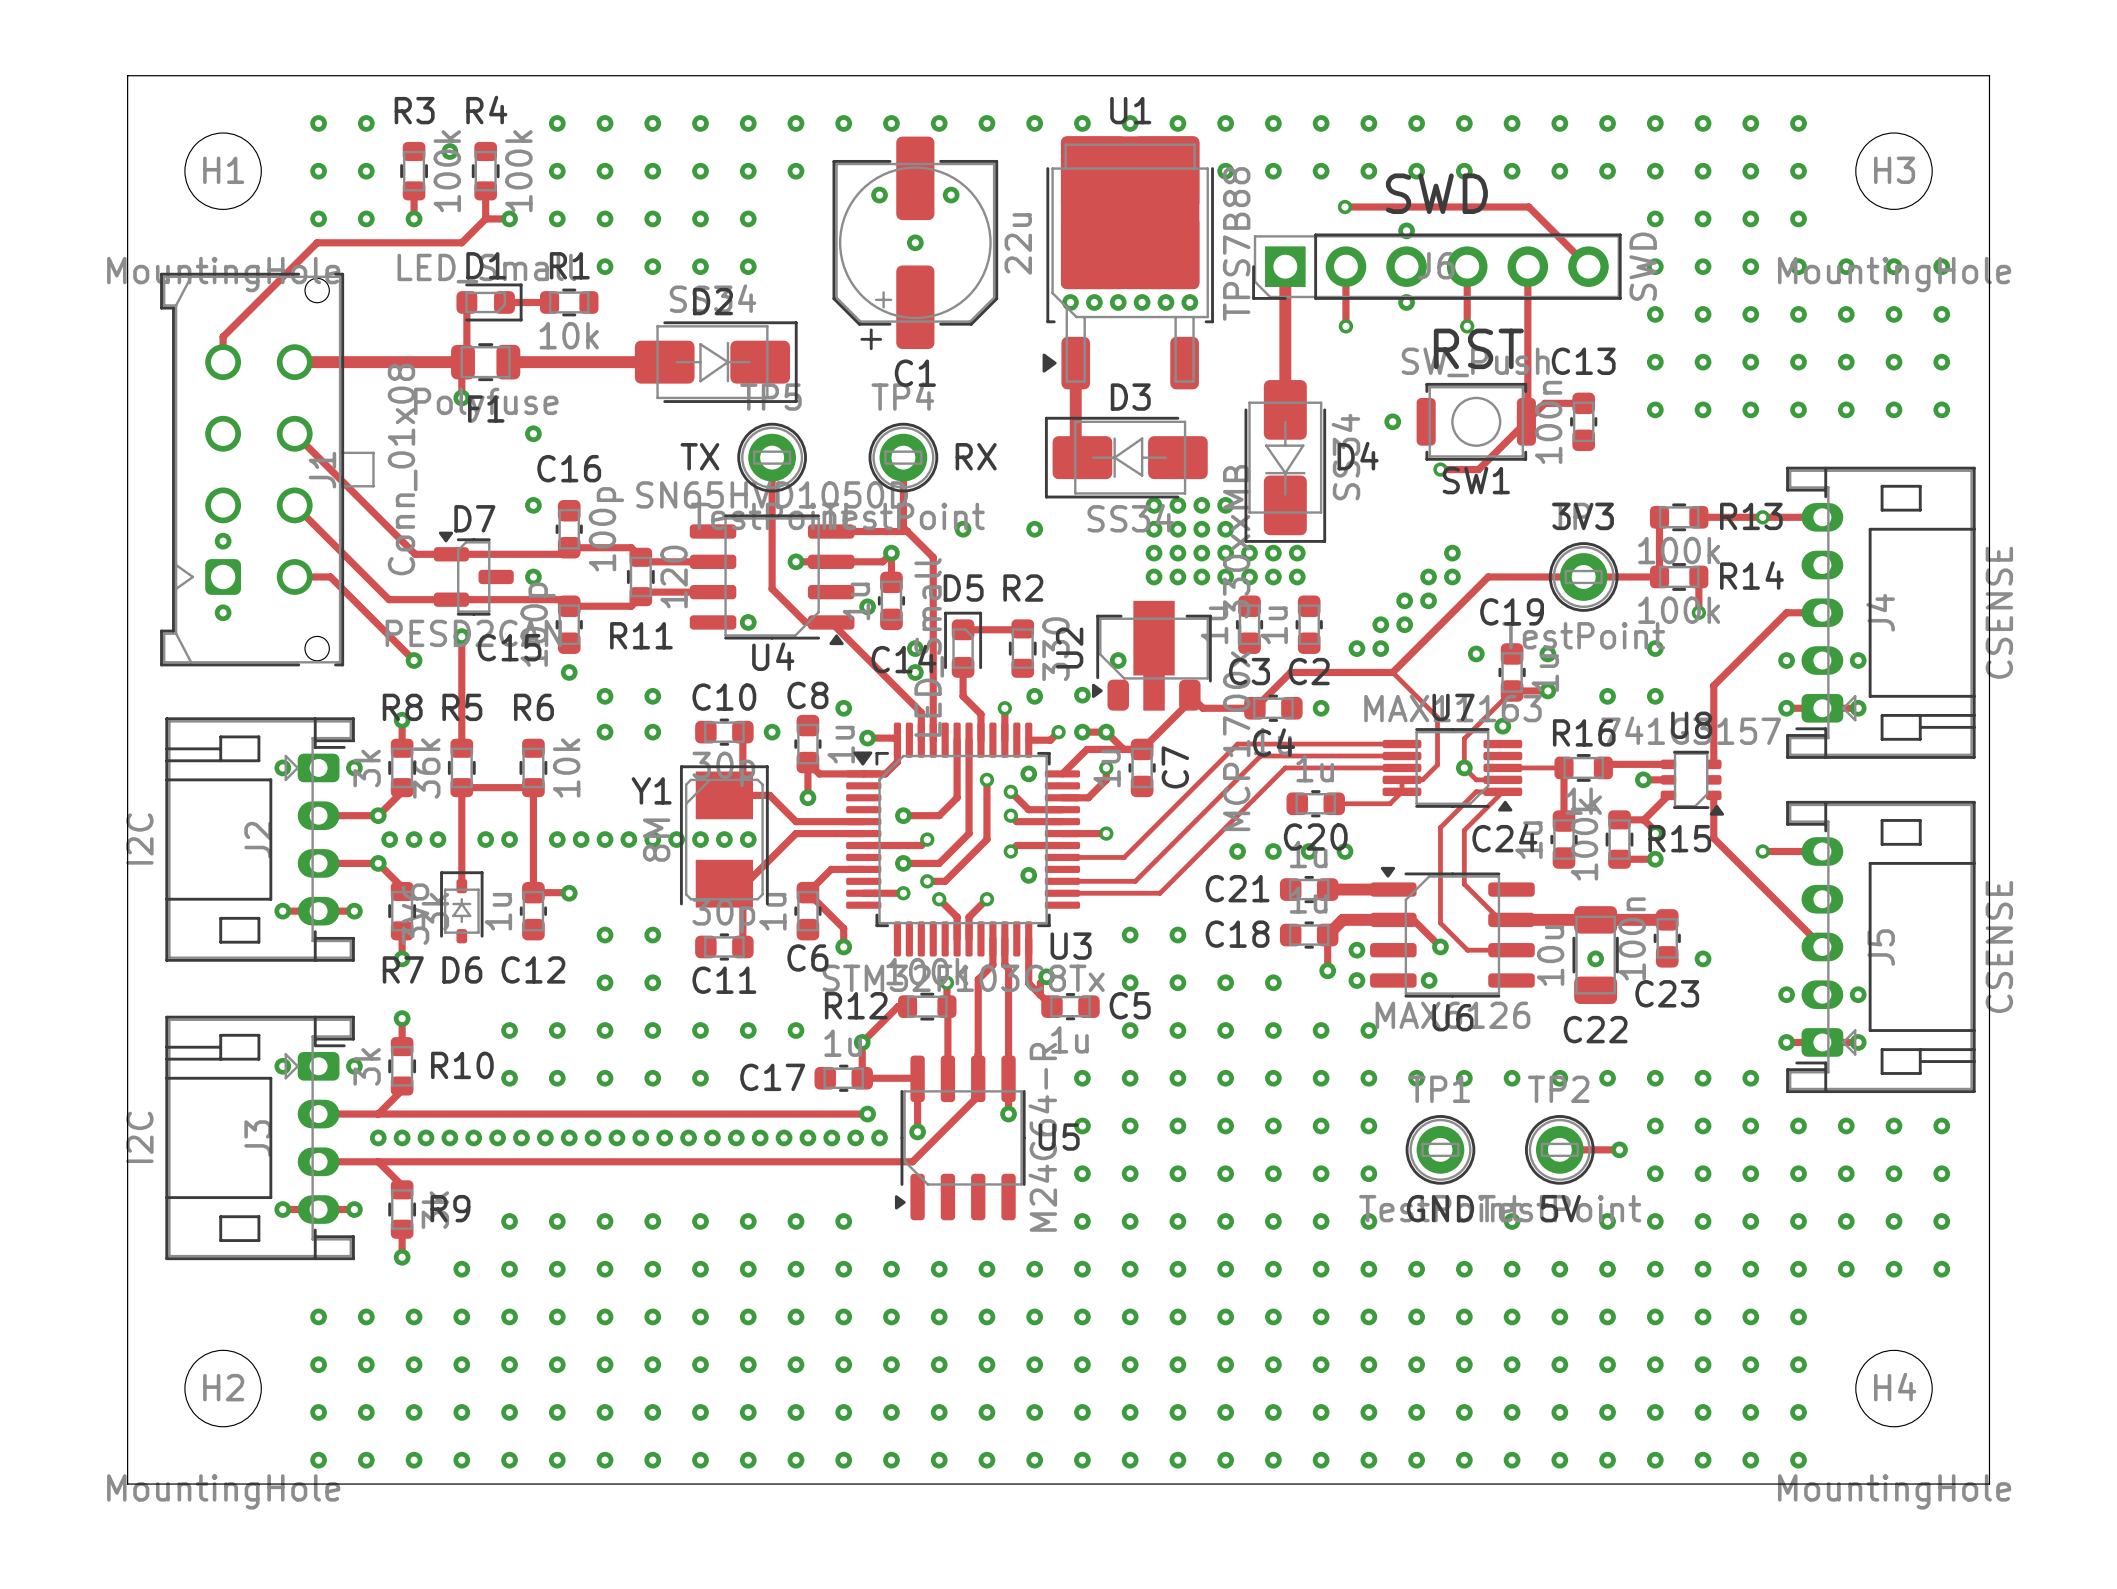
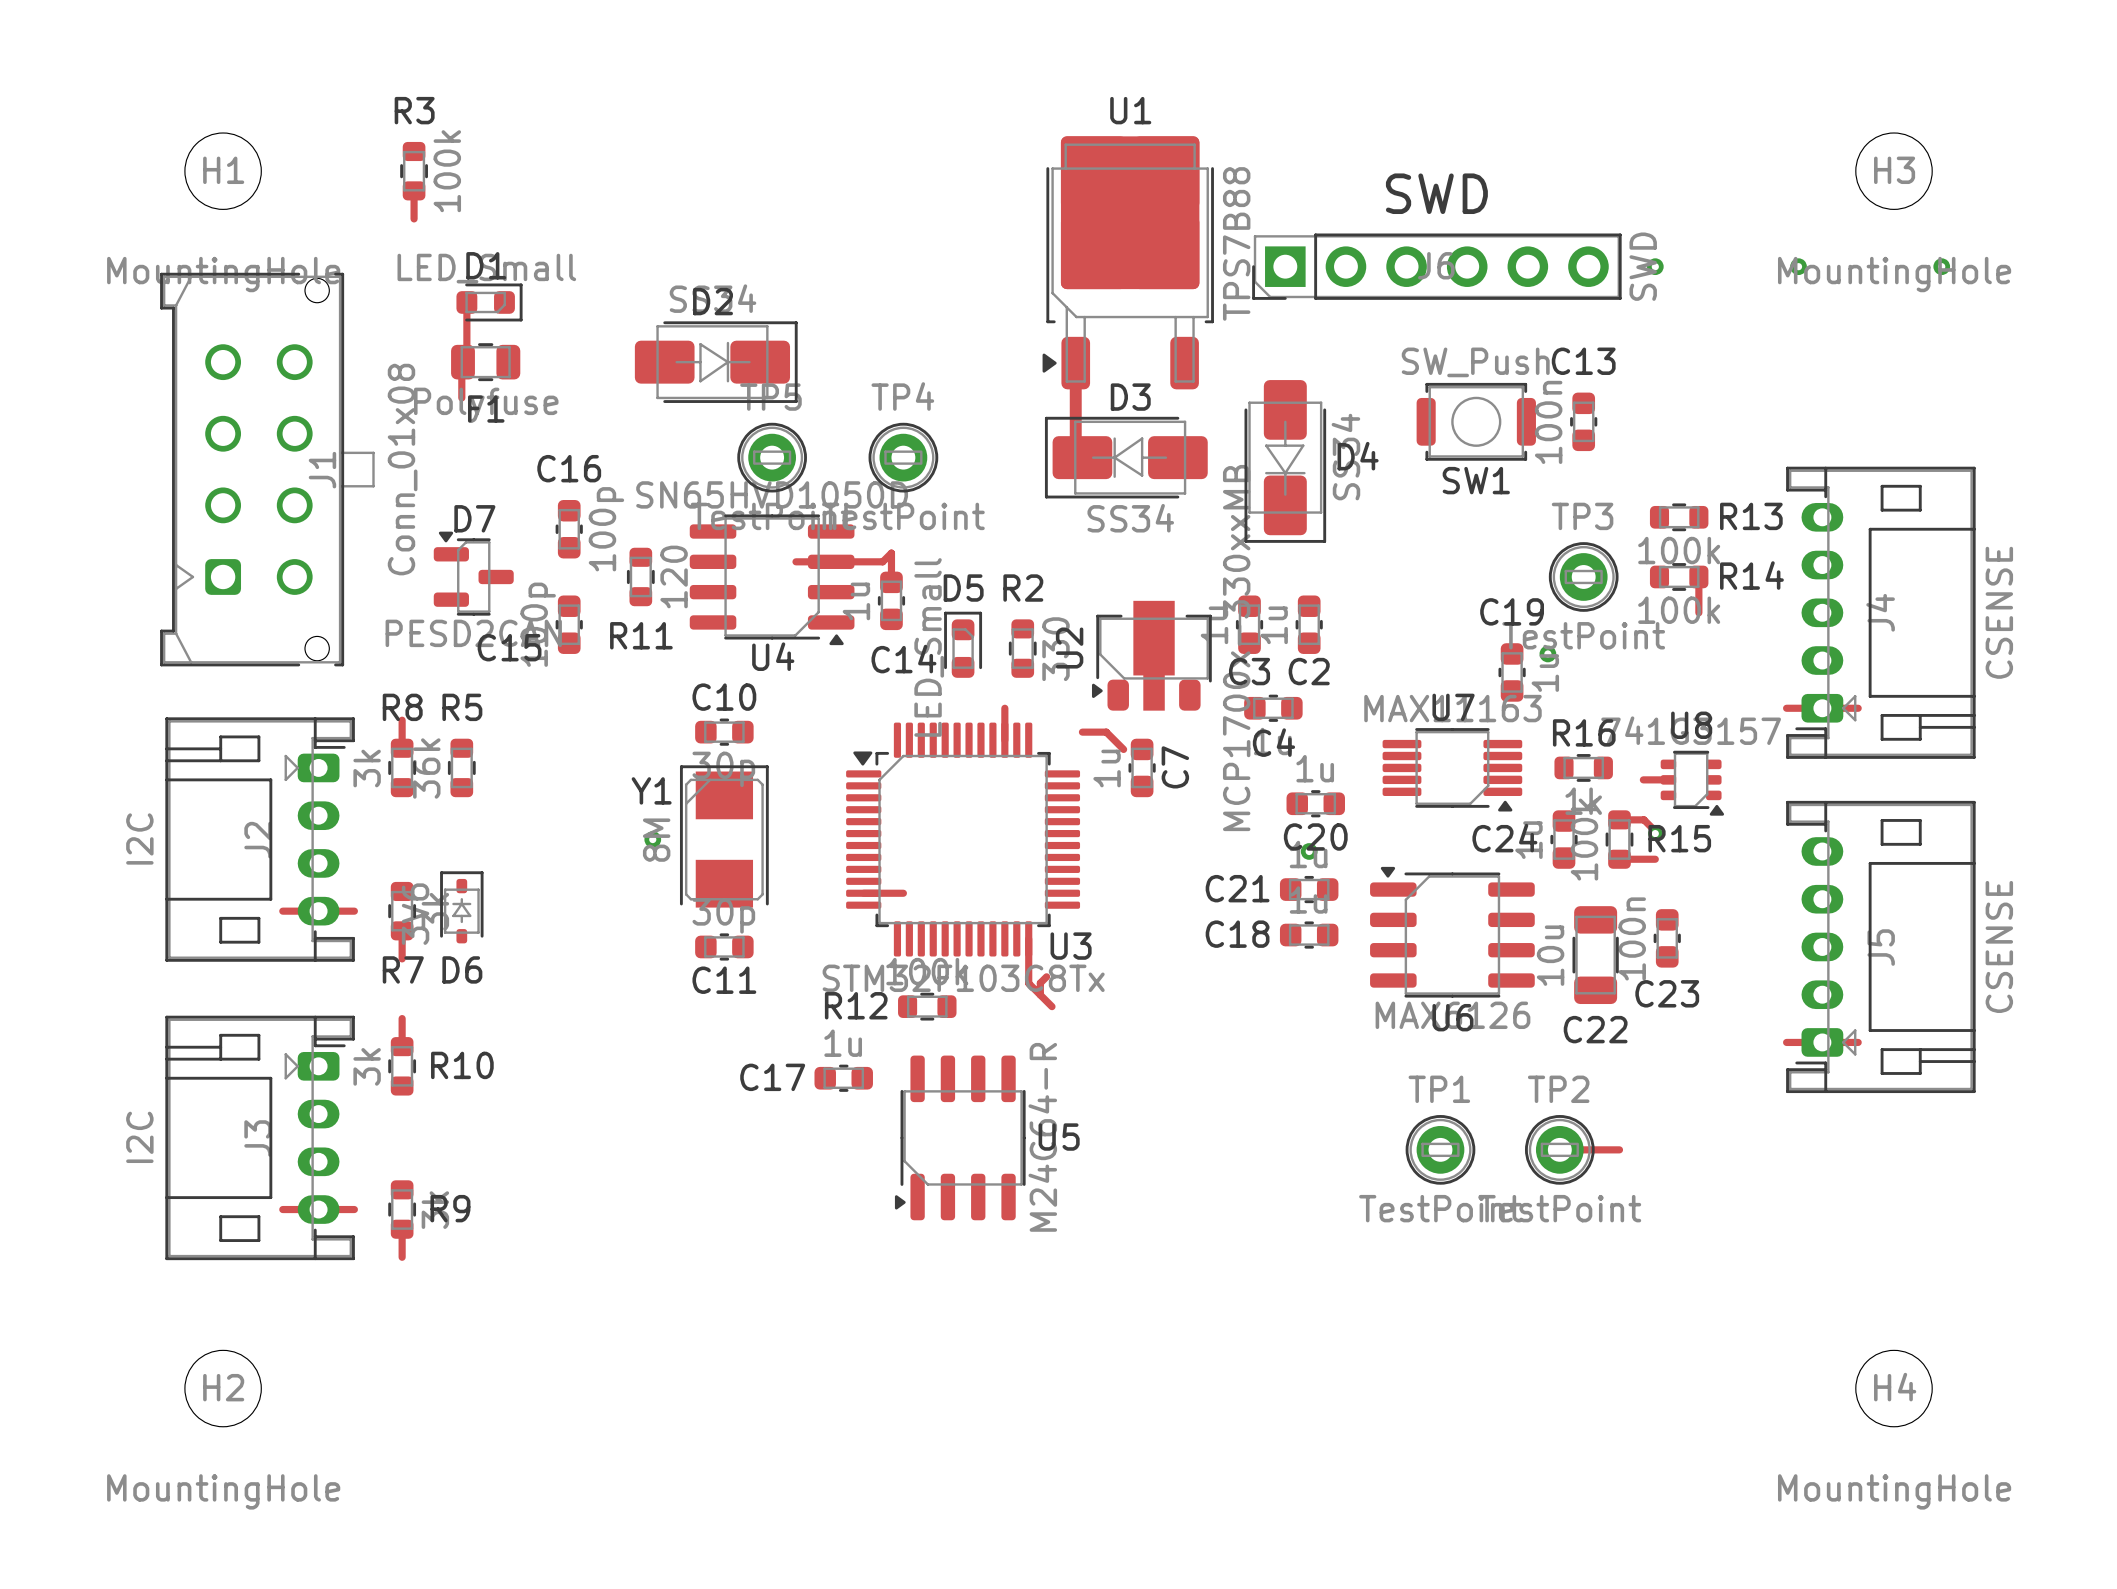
board edge: (127, 75) (127, 1484) (1989, 1484) (1989, 75) (127, 75) -> none
via: (318, 123) -> none
via: (366, 123) -> none
via: (557, 123) -> none
via: (605, 123) -> none
via: (652, 123) -> none
via: (700, 123) -> none
via: (748, 123) -> none
via: (795, 123) -> none
via: (843, 123) -> none
via: (891, 123) -> none
via: (939, 123) -> none
via: (986, 123) -> none
via: (1034, 123) -> none
via: (1082, 123) -> none
via: (1130, 123) -> none
via: (1177, 123) -> none
via: (1225, 123) -> none
via: (1273, 123) -> none
via: (1321, 123) -> none
via: (1368, 123) -> none
via: (1416, 123) -> none
via: (1464, 123) -> none
via: (1512, 123) -> none
via: (1559, 123) -> none
via: (1607, 123) -> none
via: (1655, 123) -> none
via: (1703, 123) -> none
via: (1750, 123) -> none
via: (1798, 123) -> none
via: (449, 151) -> none
via: (318, 171) -> none
via: (366, 171) -> none
R4: 100k (485, 171) -> none
via: (557, 171) -> none
via: (605, 171) -> none
via: (652, 171) -> none
via: (700, 171) -> none
via: (748, 171) -> none
via: (795, 171) -> none
via: (1225, 171) -> none
via: (1273, 171) -> none
via: (1321, 171) -> none
via: (1368, 171) -> none
via: (1416, 171) -> none
via: (1464, 171) -> none
via: (1512, 171) -> none
via: (1559, 171) -> none
via: (1607, 171) -> none
via: (1655, 171) -> none
via: (1703, 171) -> none
via: (1750, 171) -> none
via: (1798, 171) -> none
track: (485, 190) (485, 218) -> none
via: (879, 195) -> none
via: (951, 195) -> none
track: (1345, 207) (1528, 207) (1588, 266) -> none
via: (1345, 207) -> none
via: (318, 218) -> none
via: (366, 218) -> none
via: (414, 218) -> none
track: (485, 218) (461, 242) (317, 242) (223, 336) (223, 362) -> none
track: (485, 218) (509, 218) -> none
via: (509, 218) -> none
via: (557, 218) -> none
via: (605, 218) -> none
via: (652, 218) -> none
via: (700, 218) -> none
via: (748, 218) -> none
via: (1655, 218) -> none
via: (1703, 218) -> none
via: (1750, 218) -> none
via: (1798, 218) -> none
via: (1406, 230) -> none
via: (915, 242) -> none
C1: 22u (915, 243) -> none
via: (605, 266) -> none
via: (652, 266) -> none
via: (700, 266) -> none
via: (748, 266) -> none
track: (1285, 266) (1285, 409) -> none
track: (1345, 266) (1345, 326) -> none
track: (1467, 266) (1467, 326) -> none
track: (1527, 266) (1527, 420) -> none
via: (1703, 266) -> none
via: (1750, 266) -> none
via: (1846, 266) -> none
via: (1894, 266) -> none
track: (504, 302) (549, 302) -> none
R1: 10k (569, 302) -> none
via: (1070, 302) -> none
via: (1094, 302) -> none
via: (1118, 302) -> none
via: (1142, 302) -> none
via: (1165, 302) -> none
via: (1189, 302) -> none
via: (1406, 302) -> none
via: (1655, 314) -> none
via: (1703, 314) -> none
via: (1750, 314) -> none
via: (1798, 314) -> none
via: (1846, 314) -> none
via: (1894, 314) -> none
via: (1941, 314) -> none
via: (1345, 326) -> none
via: (1467, 326) -> none
text: RST (1478, 348) -> none
track: (294, 362) (463, 362) -> none
track: (508, 362) (664, 362) -> none
via: (1655, 362) -> none
via: (1703, 362) -> none
via: (1750, 362) -> none
via: (1798, 362) -> none
via: (1846, 362) -> none
via: (1894, 362) -> none
via: (1941, 362) -> none
via: (461, 397) -> none
track: (1583, 403) (1544, 403) (1478, 469) (1440, 469) -> none
via: (1655, 409) -> none
via: (1703, 409) -> none
via: (1750, 409) -> none
via: (1798, 409) -> none
via: (1846, 409) -> none
via: (1894, 409) -> none
via: (1941, 409) -> none
via: (1392, 421) -> none
track: (294, 433) (415, 554) (562, 554) (569, 547) (631, 547) (645, 561) (713, 561) -> none
via: (533, 433) -> none
text: TX (699, 456) -> none
text: RX (976, 456) -> none
track: (772, 457) (772, 588) (805, 622) (831, 622) (921, 712) (921, 740) -> none
track: (903, 457) (903, 527) (933, 557) (933, 740) -> none
via: (1440, 469) -> none
track: (294, 505) (389, 599) (562, 599) (569, 606) (631, 606) (645, 592) (713, 592) -> none
via: (533, 505) -> none
via: (1154, 505) -> none
via: (1177, 505) -> none
via: (1201, 505) -> none
via: (1225, 505) -> none
text: 3V3 (1583, 516) -> none
track: (1659, 517) (1659, 576) (1488, 576) (1392, 672) -> none
track: (1698, 517) (1822, 517) -> none
via: (1762, 517) -> none
via: (963, 529) -> none
via: (1034, 529) -> none
via: (1154, 529) -> none
via: (1177, 529) -> none
via: (1201, 529) -> none
via: (1225, 529) -> none
track: (831, 531) (907, 531) -> none
via: (223, 541) -> none
via: (891, 553) -> none
via: (1154, 553) -> none
via: (1177, 553) -> none
via: (1201, 553) -> none
via: (1225, 553) -> none
via: (1249, 553) -> none
via: (1273, 553) -> none
via: (1297, 553) -> none
via: (1452, 553) -> none
via: (795, 561) -> none
track: (294, 576) (330, 576) (414, 660) -> none
via: (533, 576) -> none
via: (1154, 576) -> none
via: (1177, 576) -> none
via: (1201, 576) -> none
via: (1225, 576) -> none
via: (1249, 576) -> none
via: (1273, 576) -> none
via: (1297, 576) -> none
via: (1428, 576) -> none
via: (1452, 576) -> none
via: (1404, 600) -> none
via: (1428, 600) -> none
via: (867, 606) -> none
via: (223, 612) -> none
via: (1698, 612) -> none
track: (1822, 612) (1786, 612) (1713, 685) (1713, 764) -> none
via: (748, 622) -> none
via: (1380, 624) -> none
via: (1404, 624) -> none
track: (1022, 628) (963, 629) -> none
track: (461, 636) (461, 748) -> none
via: (461, 636) -> none
via: (915, 648) -> none
via: (1356, 648) -> none
via: (1380, 648) -> none
via: (1655, 648) -> none
via: (1476, 653) -> none
via: (414, 660) -> none
via: (1118, 660) -> none
via: (1786, 660) -> none
via: (1858, 660) -> none
track: (963, 667) (963, 696) (980, 714) (980, 740) -> none
via: (569, 672) -> none
via: (915, 672) -> none
track: (1392, 672) (1290, 672) (1254, 708) (1202, 708) (1189, 695) (1189, 701) (1142, 749) (1086, 749) (1062, 773) -> none
track: (1392, 672) (1437, 717) (1437, 764) (1422, 779) (1401, 779) (1401, 791) (1390, 803) (1334, 803) -> none
track: (1547, 690) (1512, 690) (1464, 738) (1464, 767) (1476, 779) (1502, 779) -> none
via: (1547, 690) -> none
via: (1082, 695) -> none
via: (605, 696) -> none
via: (652, 696) -> none
via: (1034, 696) -> none
via: (1607, 696) -> none
via: (1655, 696) -> none
via: (843, 708) -> none
via: (1004, 708) -> none
via: (1321, 708) -> none
via: (1786, 708) -> none
via: (1858, 708) -> none
via: (402, 720) -> none
via: (1502, 726) -> none
via: (605, 732) -> none
via: (652, 732) -> none
track: (742, 732) (742, 776) (724, 795) (769, 795) (795, 821) (863, 821) -> none
via: (772, 732) -> none
track: (1058, 732) (1050, 740) (1028, 740) -> none
via: (1058, 732) -> none
via: (1082, 732) -> none
via: (1106, 732) -> none
track: (867, 738) (895, 738) (897, 740) (897, 761) (885, 773) (819, 773) (807, 762) (807, 797) -> none
via: (867, 738) -> none
track: (957, 740) (957, 797) (939, 815) (903, 815) -> none
track: (969, 740) (969, 833) (939, 863) (903, 863) -> none
C8: 1u (807, 744) -> none
track: (1401, 744) (1237, 744) (1124, 857) (1062, 857) -> none
track: (1401, 756) (1260, 756) (1135, 881) (1062, 881) -> none
track: (1668, 764) (1606, 764) (1603, 767) -> none
via: (282, 767) -> none
via: (354, 767) -> none
R6: 10k (533, 767) -> none
track: (1106, 767) (1106, 779) (1088, 797) (1062, 797) -> none
via: (1106, 767) -> none
track: (1401, 767) (1285, 767) (1160, 893) (1062, 893) -> none
via: (1464, 767) -> none
track: (1502, 767) (1564, 767) (1564, 821) -> none
via: (1028, 773) -> none
track: (986, 779) (986, 839) (945, 881) (927, 881) -> none
via: (986, 779) -> none
via: (1643, 779) -> none
track: (402, 787) (402, 791) (378, 815) (318, 815) -> none
track: (1010, 791) (1028, 809) (1062, 809) -> none
via: (1010, 791) -> none
track: (1668, 795) (1643, 819) -> none
track: (1713, 795) (1713, 838) (1822, 946) -> none
via: (807, 797) -> none
via: (378, 815) -> none
via: (903, 815) -> none
track: (1010, 815) (1016, 821) (1062, 821) -> none
via: (1010, 815) -> none
track: (863, 833) (795, 833) (745, 883) (724, 883) (742, 902) (742, 946) -> none
track: (1062, 833) (1106, 833) -> none
via: (1106, 833) -> none
via: (389, 839) -> none
via: (414, 839) -> none
via: (437, 839) -> none
via: (485, 839) -> none
via: (509, 839) -> none
via: (557, 839) -> none
via: (581, 839) -> none
via: (605, 839) -> none
via: (628, 839) -> none
via: (676, 839) -> none
via: (700, 839) -> none
via: (724, 839) -> none
via: (748, 839) -> none
track: (927, 839) (921, 845) (863, 845) -> none
via: (927, 839) -> none
track: (1062, 845) (1016, 845) (1010, 851) -> none
via: (1010, 851) -> none
via: (1237, 851) -> none
via: (1273, 851) -> none
via: (1345, 851) -> none
track: (1762, 851) (1822, 851) -> none
via: (1762, 851) -> none
via: (1655, 859) -> none
track: (318, 863) (378, 863) (402, 887) (402, 891) -> none
via: (378, 863) -> none
via: (903, 863) -> none
track: (863, 869) (831, 869) (807, 892) (843, 928) (843, 946) -> none
via: (1028, 875) -> none
via: (927, 881) -> none
track: (461, 886) (461, 787) (533, 787) (533, 892) (569, 893) -> none
track: (1327, 889) (1393, 889) -> none
via: (569, 893) -> none
via: (903, 893) -> none
track: (939, 899) (957, 917) (957, 938) -> none
via: (939, 899) -> none
track: (986, 899) (969, 917) (969, 938) -> none
via: (986, 899) -> none
via: (282, 911) -> none
via: (354, 911) -> none
C12: 1u (533, 911) -> none
C6: 1u (807, 911) -> none
track: (1667, 919) (1500, 919) (1464, 884) (1464, 830) (1502, 791) (1476, 791) (1440, 827) (1440, 923) (1467, 950) (1511, 950) -> none
via: (605, 935) -> none
via: (652, 935) -> none
via: (1130, 935) -> none
via: (1177, 935) -> none
track: (992, 938) (992, 964) (978, 979) (978, 1096) (912, 1161) (318, 1161) -> none
track: (1004, 938) (1004, 964) (1008, 968) (1008, 1114) -> none
via: (843, 946) -> none
track: (1440, 946) (1413, 919) (1342, 919) (1327, 935) (1327, 970) -> none
via: (1440, 946) -> none
via: (1356, 950) -> none
via: (402, 958) -> none
via: (1595, 958) -> none
via: (1703, 958) -> none
via: (1327, 970) -> none
via: (1046, 976) -> none
via: (1356, 980) -> none
via: (1429, 980) -> none
via: (605, 982) -> none
via: (652, 982) -> none
track: (946, 982) (947, 1078) -> none
via: (946, 982) -> none
via: (1130, 982) -> none
via: (1177, 982) -> none
via: (1225, 982) -> none
via: (1273, 982) -> none
via: (1786, 994) -> none
via: (1858, 994) -> none
track: (907, 1006) (898, 1006) (862, 1042) (862, 1078) (917, 1078) (917, 1131) -> none
C5: 1u (1070, 1006) -> none
via: (402, 1018) -> none
via: (509, 1030) -> none
via: (557, 1030) -> none
via: (605, 1030) -> none
via: (652, 1030) -> none
via: (700, 1030) -> none
via: (748, 1030) -> none
via: (795, 1030) -> none
via: (1130, 1030) -> none
via: (1177, 1030) -> none
via: (1225, 1030) -> none
via: (1273, 1030) -> none
via: (1321, 1030) -> none
via: (1368, 1030) -> none
via: (862, 1042) -> none
via: (1786, 1042) -> none
via: (1858, 1042) -> none
via: (282, 1066) -> none
via: (354, 1066) -> none
via: (509, 1078) -> none
via: (557, 1078) -> none
via: (605, 1078) -> none
via: (652, 1078) -> none
via: (700, 1078) -> none
via: (1082, 1078) -> none
via: (1130, 1078) -> none
via: (1177, 1078) -> none
via: (1225, 1078) -> none
via: (1273, 1078) -> none
via: (1321, 1078) -> none
via: (1368, 1078) -> none
via: (1416, 1078) -> none
via: (1464, 1078) -> none
via: (1512, 1078) -> none
via: (1559, 1078) -> none
via: (1607, 1078) -> none
via: (1655, 1078) -> none
via: (1703, 1078) -> none
via: (1750, 1078) -> none
track: (402, 1086) (402, 1090) (378, 1114) -> none
track: (318, 1114) (867, 1114) -> none
via: (867, 1114) -> none
via: (1008, 1114) -> none
via: (1082, 1125) -> none
via: (1130, 1125) -> none
via: (1177, 1125) -> none
via: (1225, 1125) -> none
via: (1273, 1125) -> none
via: (1321, 1125) -> none
via: (1368, 1125) -> none
via: (1655, 1125) -> none
via: (1703, 1125) -> none
via: (1750, 1125) -> none
via: (1798, 1125) -> none
via: (1846, 1125) -> none
via: (1894, 1125) -> none
via: (1941, 1125) -> none
via: (917, 1131) -> none
via: (378, 1137) -> none
via: (402, 1137) -> none
via: (426, 1137) -> none
via: (449, 1137) -> none
via: (473, 1137) -> none
via: (497, 1137) -> none
via: (521, 1137) -> none
via: (545, 1137) -> none
via: (569, 1137) -> none
via: (593, 1137) -> none
via: (616, 1137) -> none
via: (640, 1137) -> none
via: (664, 1137) -> none
via: (688, 1137) -> none
via: (712, 1137) -> none
via: (736, 1137) -> none
via: (760, 1137) -> none
via: (784, 1137) -> none
via: (807, 1137) -> none
via: (831, 1137) -> none
via: (855, 1137) -> none
via: (879, 1137) -> none
via: (1619, 1149) -> none
track: (378, 1161) (402, 1185) (402, 1189) -> none
via: (1082, 1173) -> none
via: (1130, 1173) -> none
via: (1177, 1173) -> none
via: (1225, 1173) -> none
via: (1273, 1173) -> none
via: (1321, 1173) -> none
via: (1368, 1173) -> none
via: (1655, 1173) -> none
via: (1703, 1173) -> none
via: (1750, 1173) -> none
via: (1798, 1173) -> none
via: (1846, 1173) -> none
via: (1894, 1173) -> none
via: (1941, 1173) -> none
text: GND (1440, 1208) -> none
text: 5V (1560, 1208) -> none
via: (282, 1209) -> none
via: (354, 1209) -> none
via: (509, 1221) -> none
via: (557, 1221) -> none
via: (605, 1221) -> none
via: (652, 1221) -> none
via: (700, 1221) -> none
via: (748, 1221) -> none
via: (795, 1221) -> none
via: (843, 1221) -> none
via: (1082, 1221) -> none
via: (1130, 1221) -> none
via: (1177, 1221) -> none
via: (1225, 1221) -> none
via: (1273, 1221) -> none
via: (1321, 1221) -> none
via: (1368, 1221) -> none
via: (1512, 1221) -> none
via: (1607, 1221) -> none
via: (1655, 1221) -> none
via: (1703, 1221) -> none
via: (1750, 1221) -> none
via: (1798, 1221) -> none
via: (1846, 1221) -> none
via: (1894, 1221) -> none
via: (1941, 1221) -> none
via: (402, 1257) -> none
via: (461, 1269) -> none
via: (509, 1269) -> none
via: (557, 1269) -> none
via: (605, 1269) -> none
via: (652, 1269) -> none
via: (700, 1269) -> none
via: (748, 1269) -> none
via: (795, 1269) -> none
via: (843, 1269) -> none
via: (891, 1269) -> none
via: (939, 1269) -> none
via: (986, 1269) -> none
via: (1034, 1269) -> none
via: (1082, 1269) -> none
via: (1130, 1269) -> none
via: (1177, 1269) -> none
via: (1225, 1269) -> none
via: (1273, 1269) -> none
via: (1321, 1269) -> none
via: (1368, 1269) -> none
via: (1416, 1269) -> none
via: (1464, 1269) -> none
via: (1512, 1269) -> none
via: (1559, 1269) -> none
via: (1607, 1269) -> none
via: (1655, 1269) -> none
via: (1703, 1269) -> none
via: (1750, 1269) -> none
via: (1798, 1269) -> none
via: (1846, 1269) -> none
via: (1894, 1269) -> none
via: (1941, 1269) -> none
via: (318, 1316) -> none
via: (366, 1316) -> none
via: (414, 1316) -> none
via: (461, 1316) -> none
via: (509, 1316) -> none
via: (557, 1316) -> none
via: (605, 1316) -> none
via: (652, 1316) -> none
via: (700, 1316) -> none
via: (748, 1316) -> none
via: (795, 1316) -> none
via: (843, 1316) -> none
via: (891, 1316) -> none
via: (939, 1316) -> none
via: (986, 1316) -> none
via: (1034, 1316) -> none
via: (1082, 1316) -> none
via: (1130, 1316) -> none
via: (1177, 1316) -> none
via: (1225, 1316) -> none
via: (1273, 1316) -> none
via: (1321, 1316) -> none
via: (1368, 1316) -> none
via: (1416, 1316) -> none
via: (1464, 1316) -> none
via: (1512, 1316) -> none
via: (1559, 1316) -> none
via: (1607, 1316) -> none
via: (1655, 1316) -> none
via: (1703, 1316) -> none
via: (1750, 1316) -> none
via: (1798, 1316) -> none
via: (318, 1364) -> none
via: (366, 1364) -> none
via: (414, 1364) -> none
via: (461, 1364) -> none
via: (509, 1364) -> none
via: (557, 1364) -> none
via: (605, 1364) -> none
via: (652, 1364) -> none
via: (700, 1364) -> none
via: (748, 1364) -> none
via: (795, 1364) -> none
via: (843, 1364) -> none
via: (891, 1364) -> none
via: (939, 1364) -> none
via: (986, 1364) -> none
via: (1034, 1364) -> none
via: (1082, 1364) -> none
via: (1130, 1364) -> none
via: (1177, 1364) -> none
via: (1225, 1364) -> none
via: (1273, 1364) -> none
via: (1321, 1364) -> none
via: (1368, 1364) -> none
via: (1416, 1364) -> none
via: (1464, 1364) -> none
via: (1512, 1364) -> none
via: (1559, 1364) -> none
via: (1607, 1364) -> none
via: (1655, 1364) -> none
via: (1703, 1364) -> none
via: (1750, 1364) -> none
via: (1798, 1364) -> none
via: (318, 1412) -> none
via: (366, 1412) -> none
via: (414, 1412) -> none
via: (461, 1412) -> none
via: (509, 1412) -> none
via: (557, 1412) -> none
via: (605, 1412) -> none
via: (652, 1412) -> none
via: (700, 1412) -> none
via: (748, 1412) -> none
via: (795, 1412) -> none
via: (843, 1412) -> none
via: (891, 1412) -> none
via: (939, 1412) -> none
via: (986, 1412) -> none
via: (1034, 1412) -> none
via: (1082, 1412) -> none
via: (1130, 1412) -> none
via: (1177, 1412) -> none
via: (1225, 1412) -> none
via: (1273, 1412) -> none
via: (1321, 1412) -> none
via: (1368, 1412) -> none
via: (1416, 1412) -> none
via: (1464, 1412) -> none
via: (1512, 1412) -> none
via: (1559, 1412) -> none
via: (1607, 1412) -> none
via: (1655, 1412) -> none
via: (1703, 1412) -> none
via: (1750, 1412) -> none
via: (1798, 1412) -> none
via: (318, 1460) -> none
via: (366, 1460) -> none
via: (414, 1460) -> none
via: (461, 1460) -> none
via: (509, 1460) -> none
via: (557, 1460) -> none
via: (605, 1460) -> none
via: (652, 1460) -> none
via: (700, 1460) -> none
via: (748, 1460) -> none
via: (795, 1460) -> none
via: (843, 1460) -> none
via: (891, 1460) -> none
via: (939, 1460) -> none
via: (986, 1460) -> none
via: (1034, 1460) -> none
via: (1082, 1460) -> none
via: (1130, 1460) -> none
via: (1177, 1460) -> none
via: (1225, 1460) -> none
via: (1273, 1460) -> none
via: (1321, 1460) -> none
via: (1368, 1460) -> none
via: (1416, 1460) -> none
via: (1464, 1460) -> none
via: (1512, 1460) -> none
via: (1559, 1460) -> none
via: (1607, 1460) -> none
via: (1655, 1460) -> none
via: (1703, 1460) -> none
via: (1750, 1460) -> none
via: (1798, 1460) -> none

